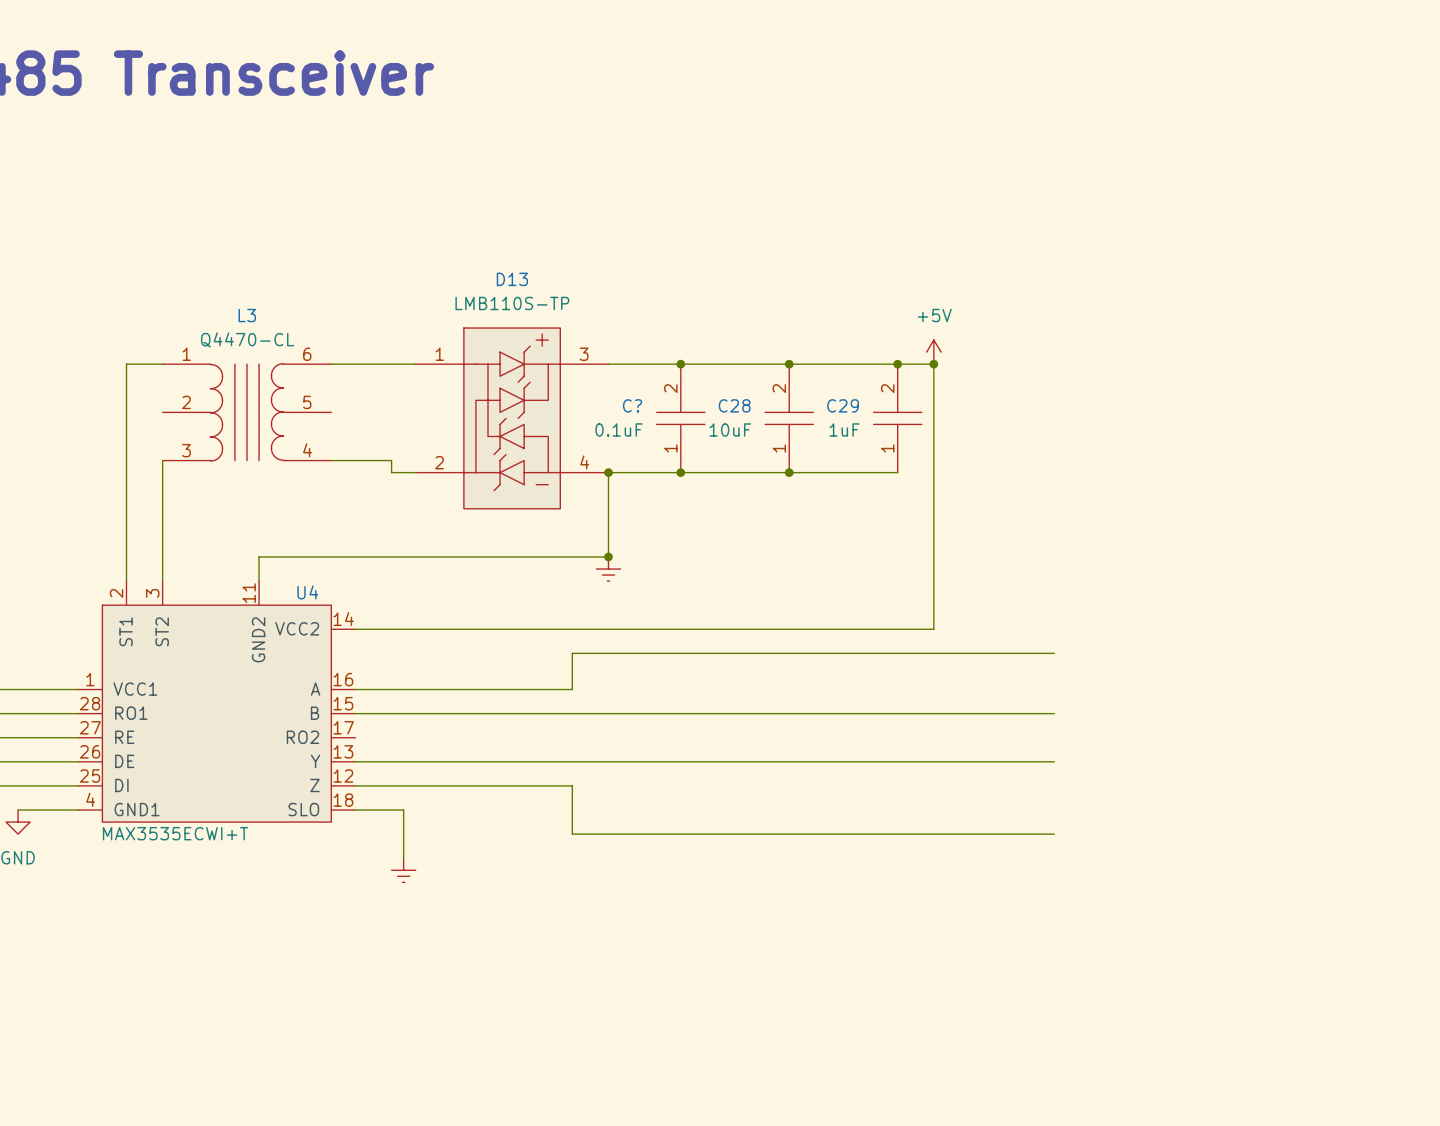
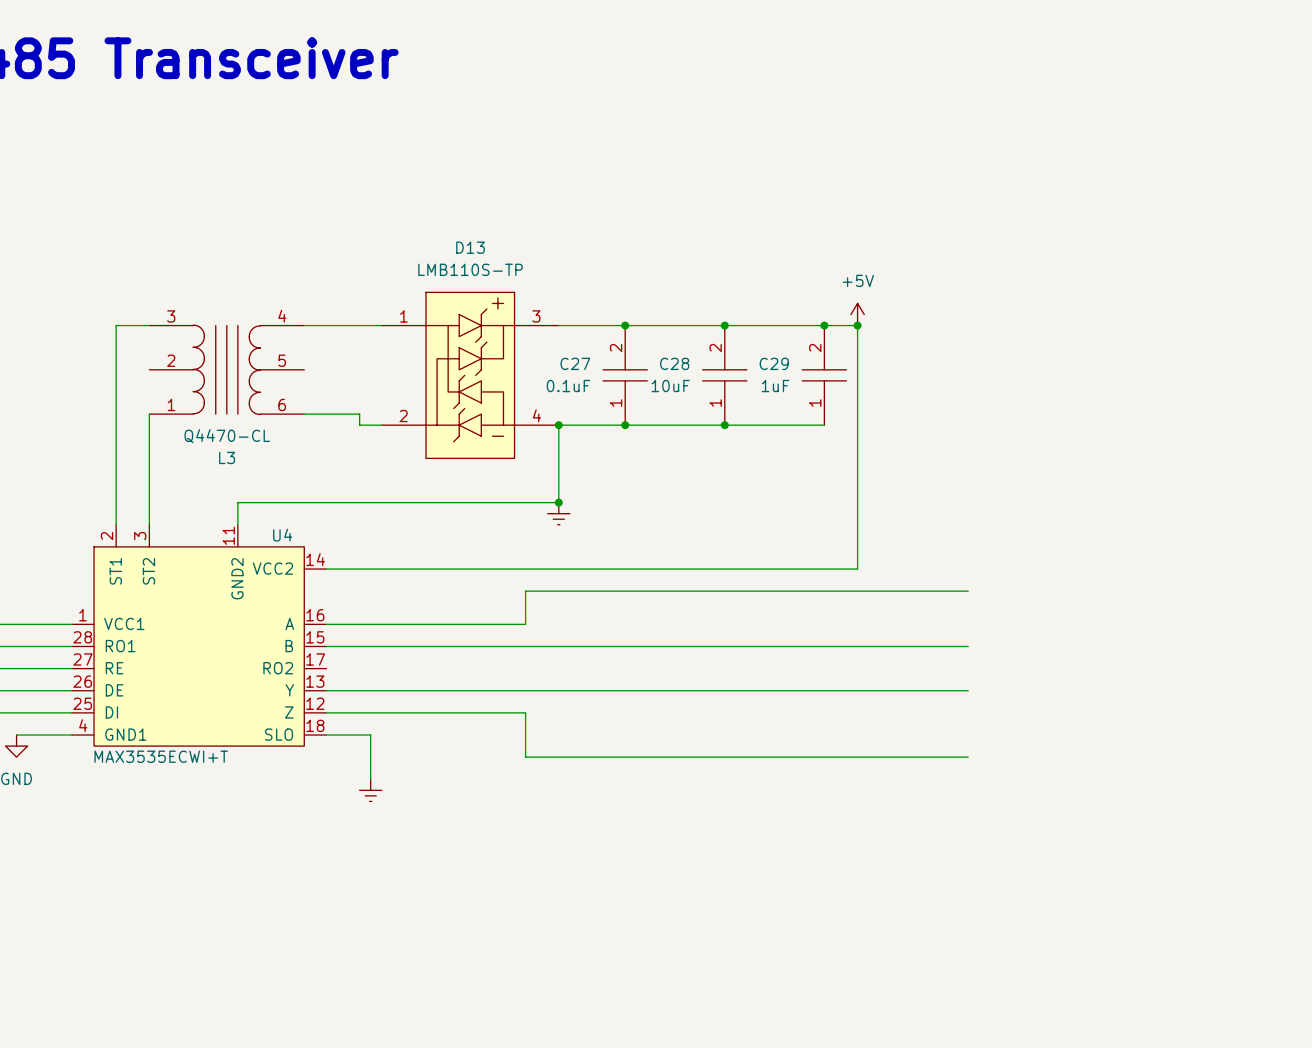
C? name: C? (632, 405) -> C27 (575, 363)
L3 flip: as is (246, 412) -> up-down (226, 369)

